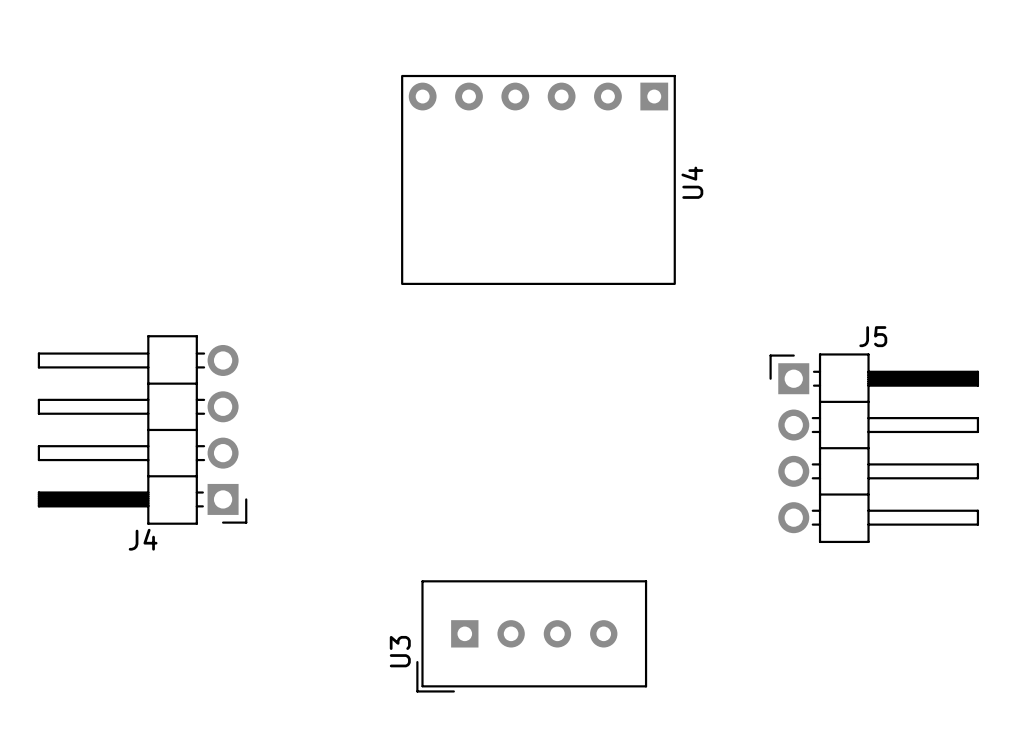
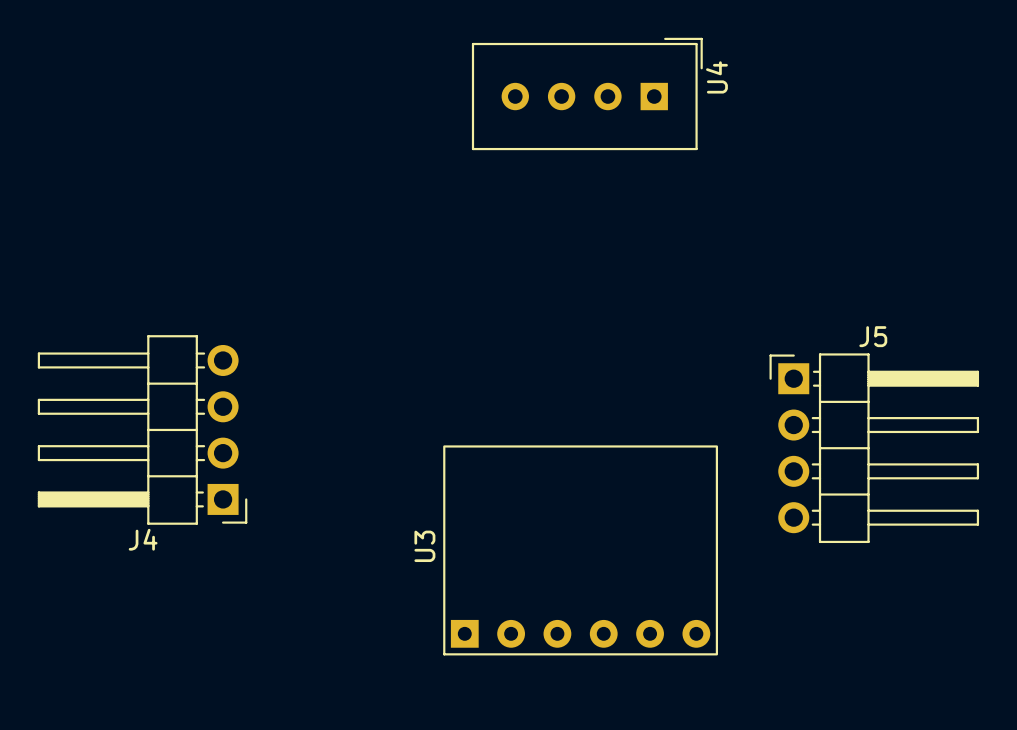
U4 footprint: [401, 74, 676, 285] -> [471, 37, 703, 151]
U3 footprint: [416, 580, 648, 693] -> [443, 445, 718, 656]

